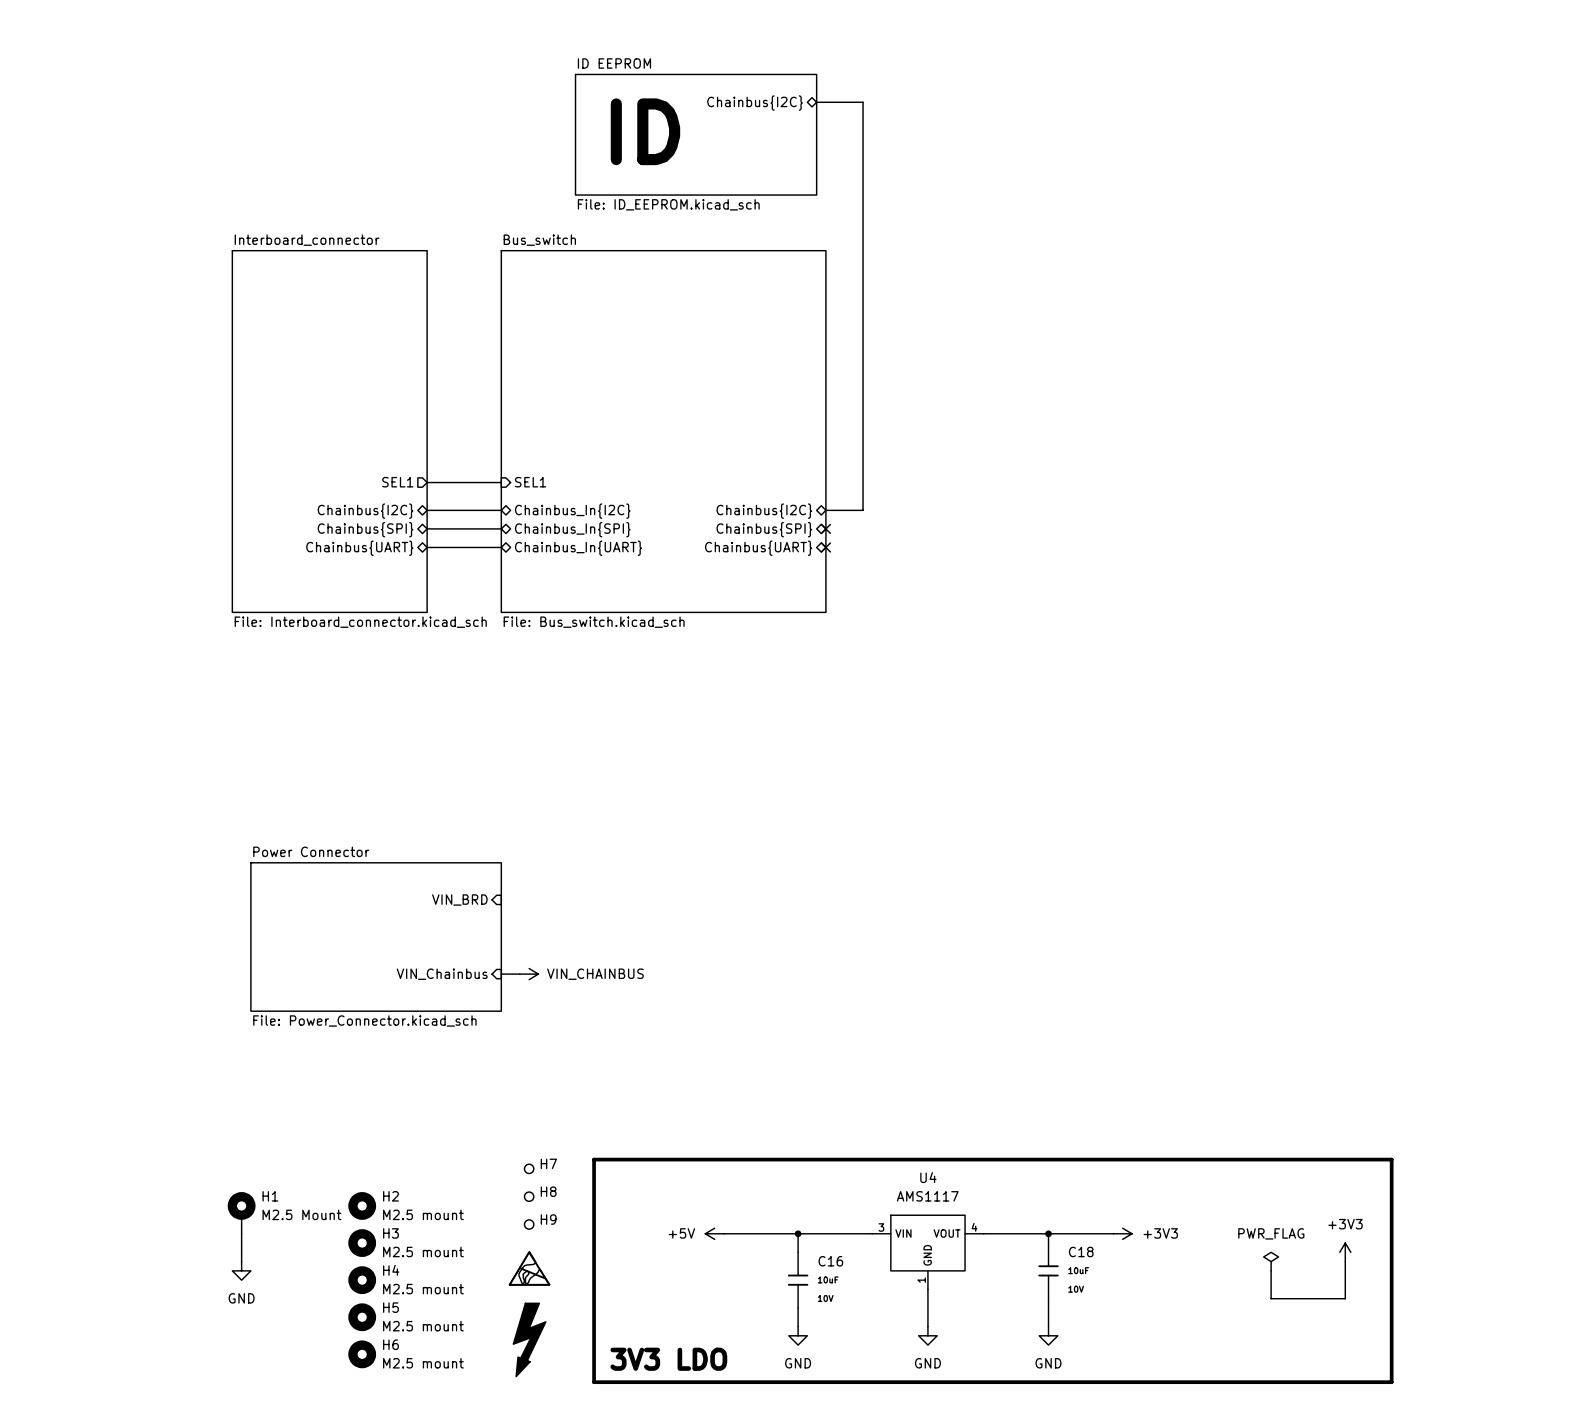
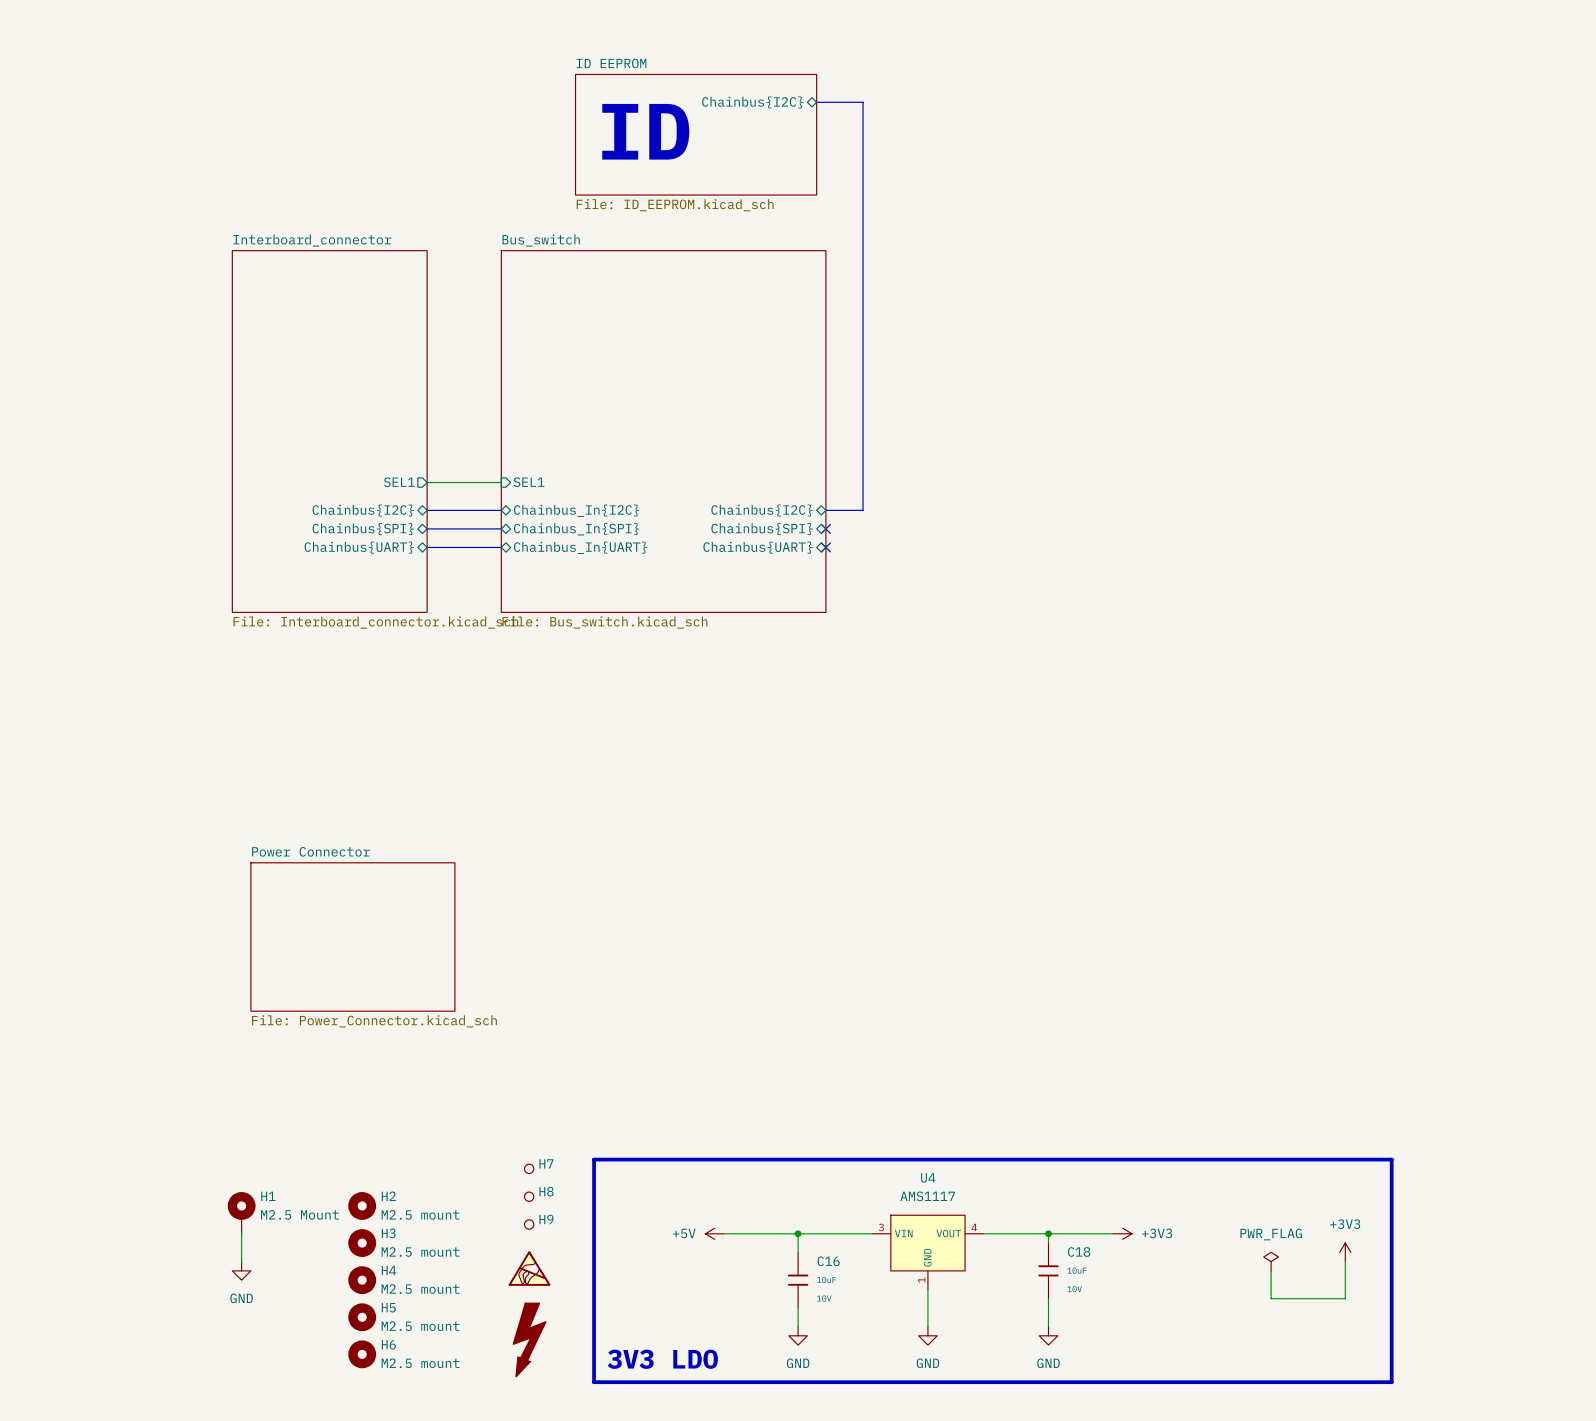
sheet pin: VIN_BRD (459, 899) -> none
sheet Power Connector: none -> File: Power_Connector.kicad_sch (352, 937)
sheet Power Connector: File: Power_Connector.kicad_sch (376, 937) -> none
sheet pin: VIN_Chainbus (442, 974) -> none
wire: (501, 974) (519, 974) -> none
power symbol: VIN_CHAINBUS (529, 974) -> none

